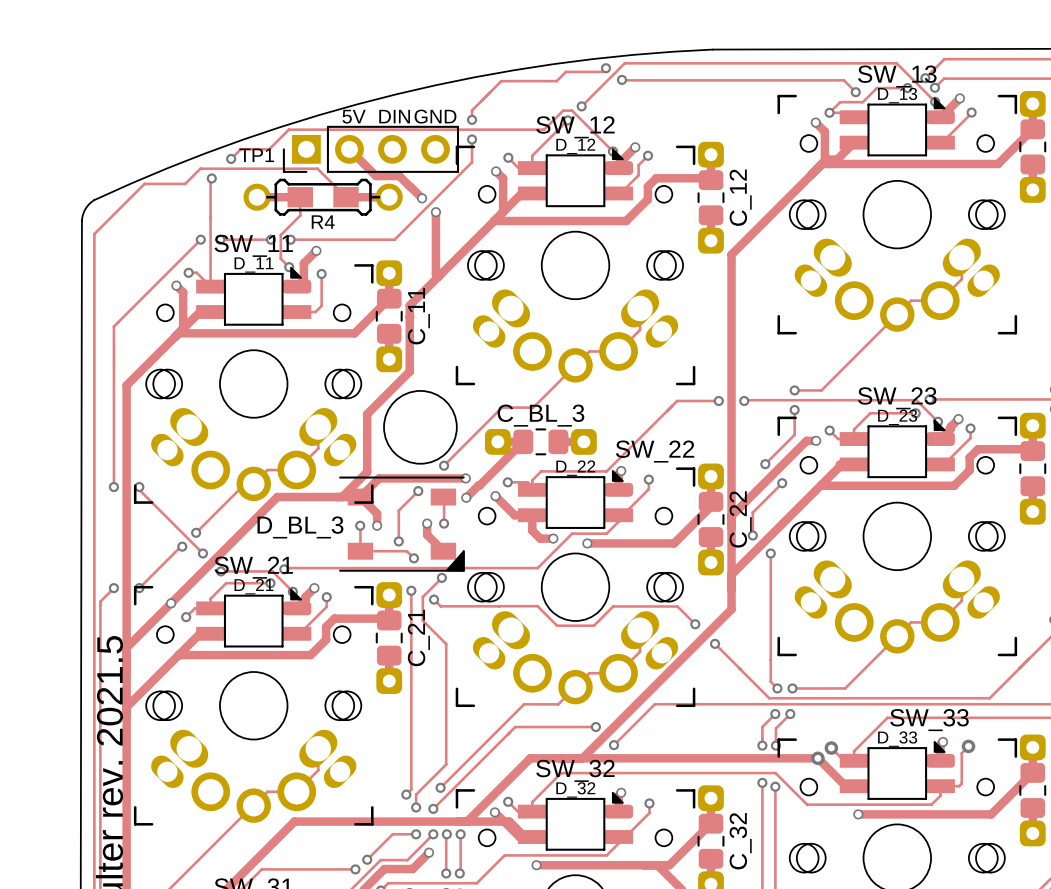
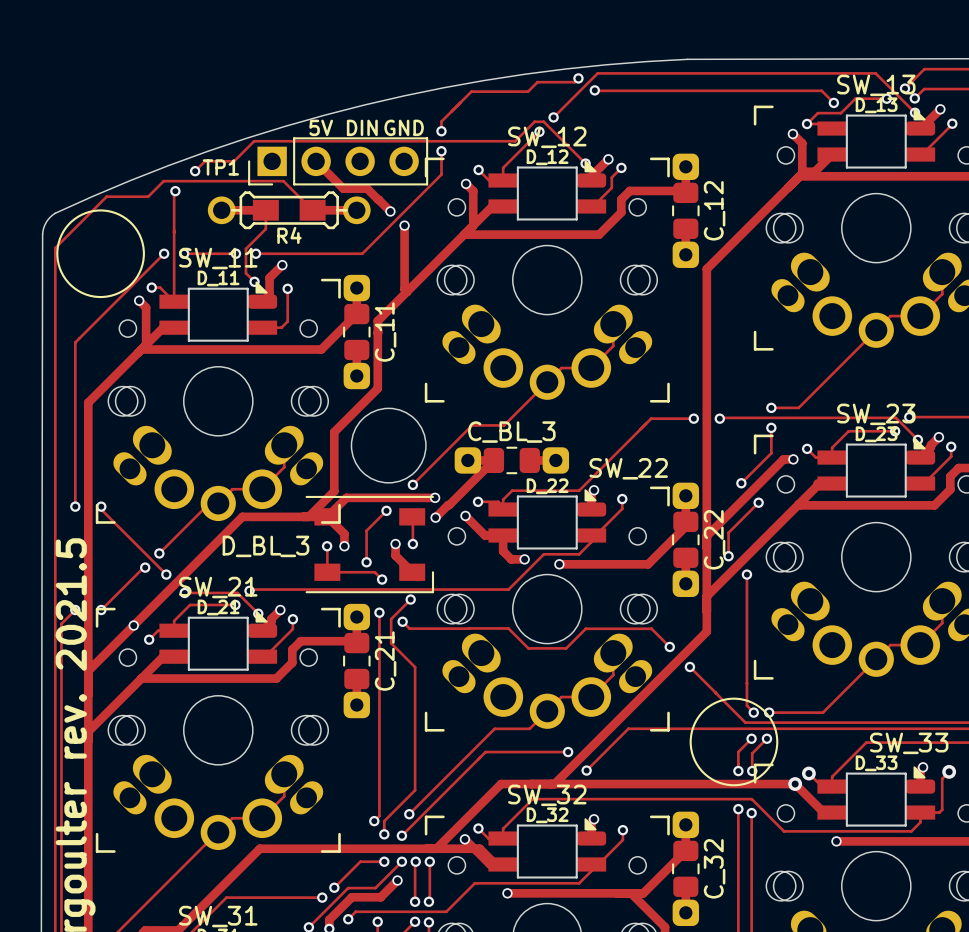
drawing: none -> [56, 209, 145, 299]
D_BL_3 footprint: [339, 476, 465, 572] -> [305, 495, 435, 594]
drawing: none -> [689, 697, 779, 787]

